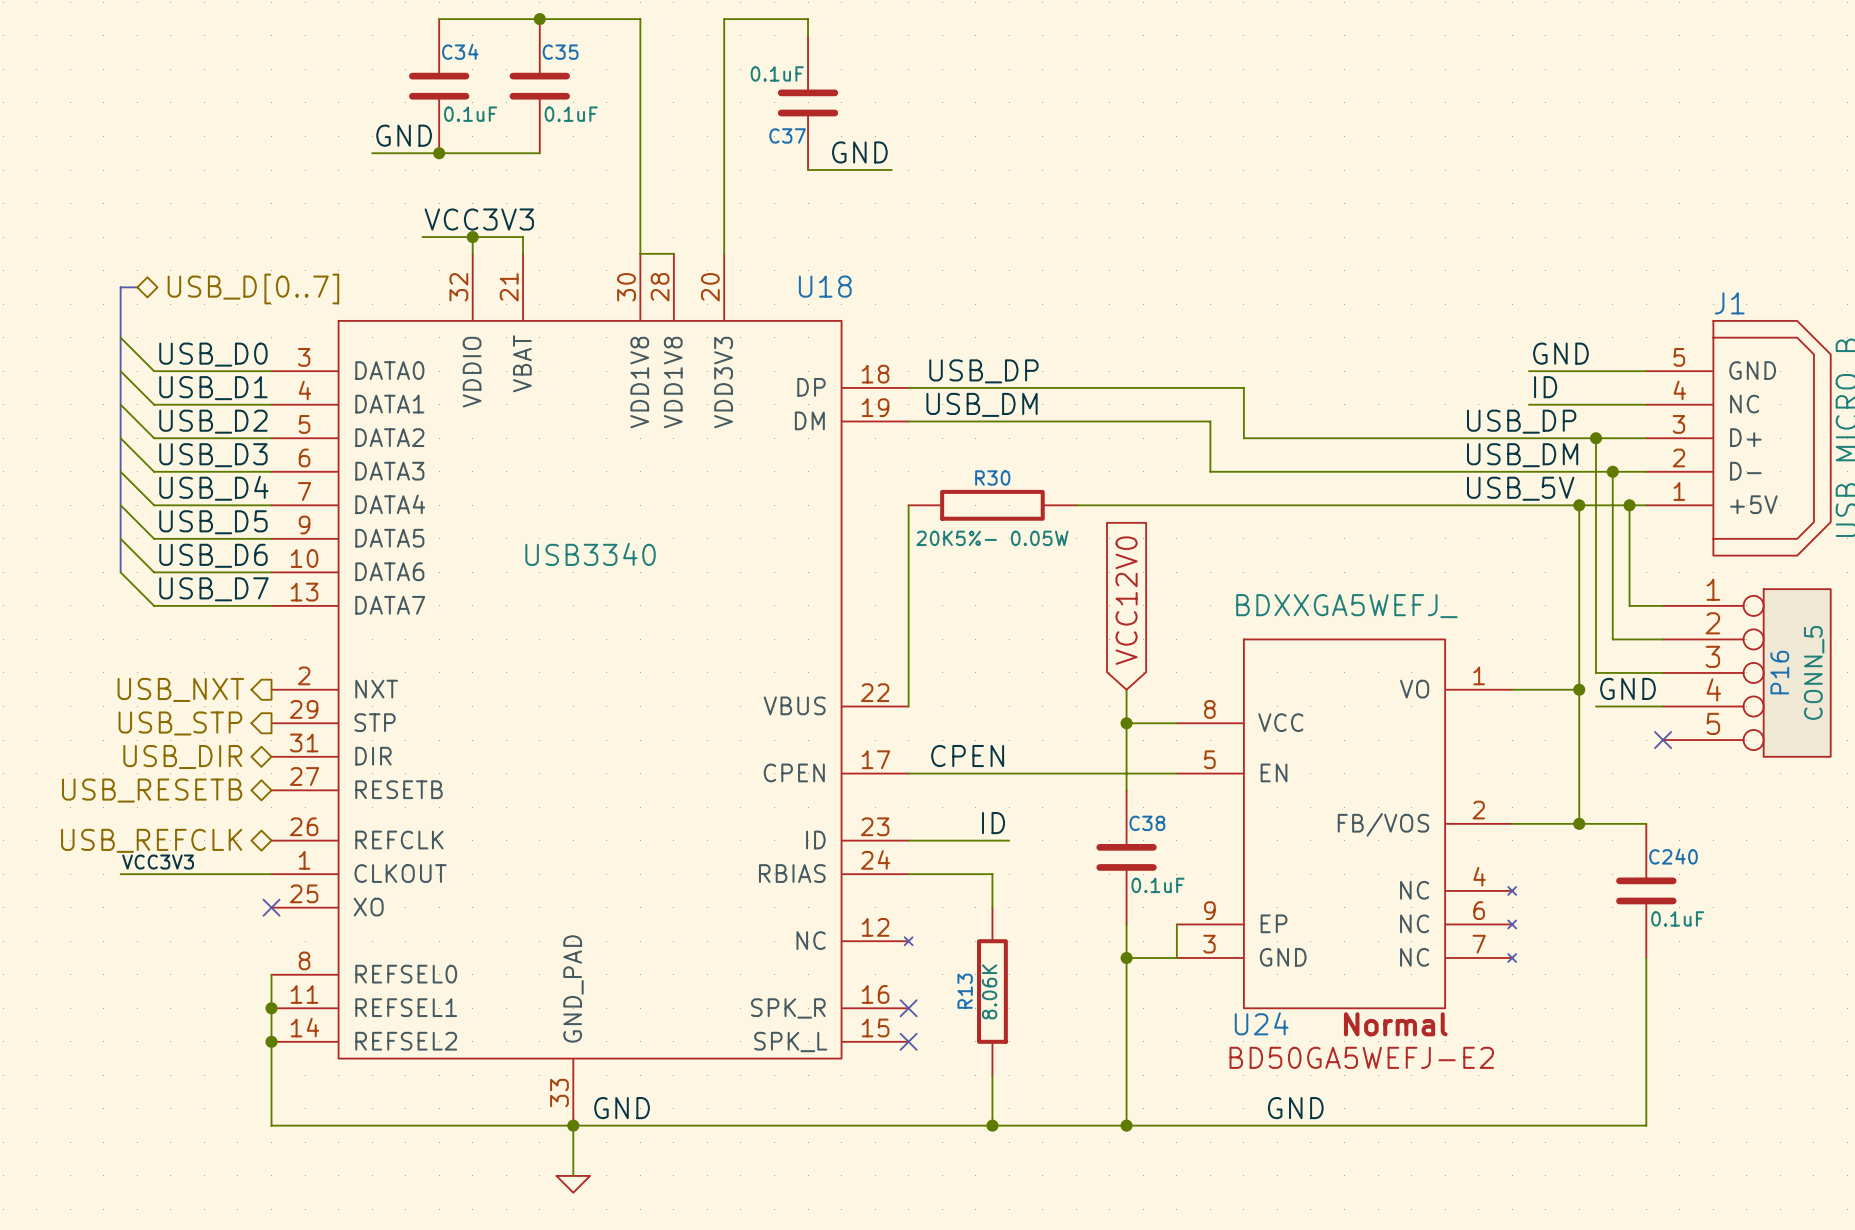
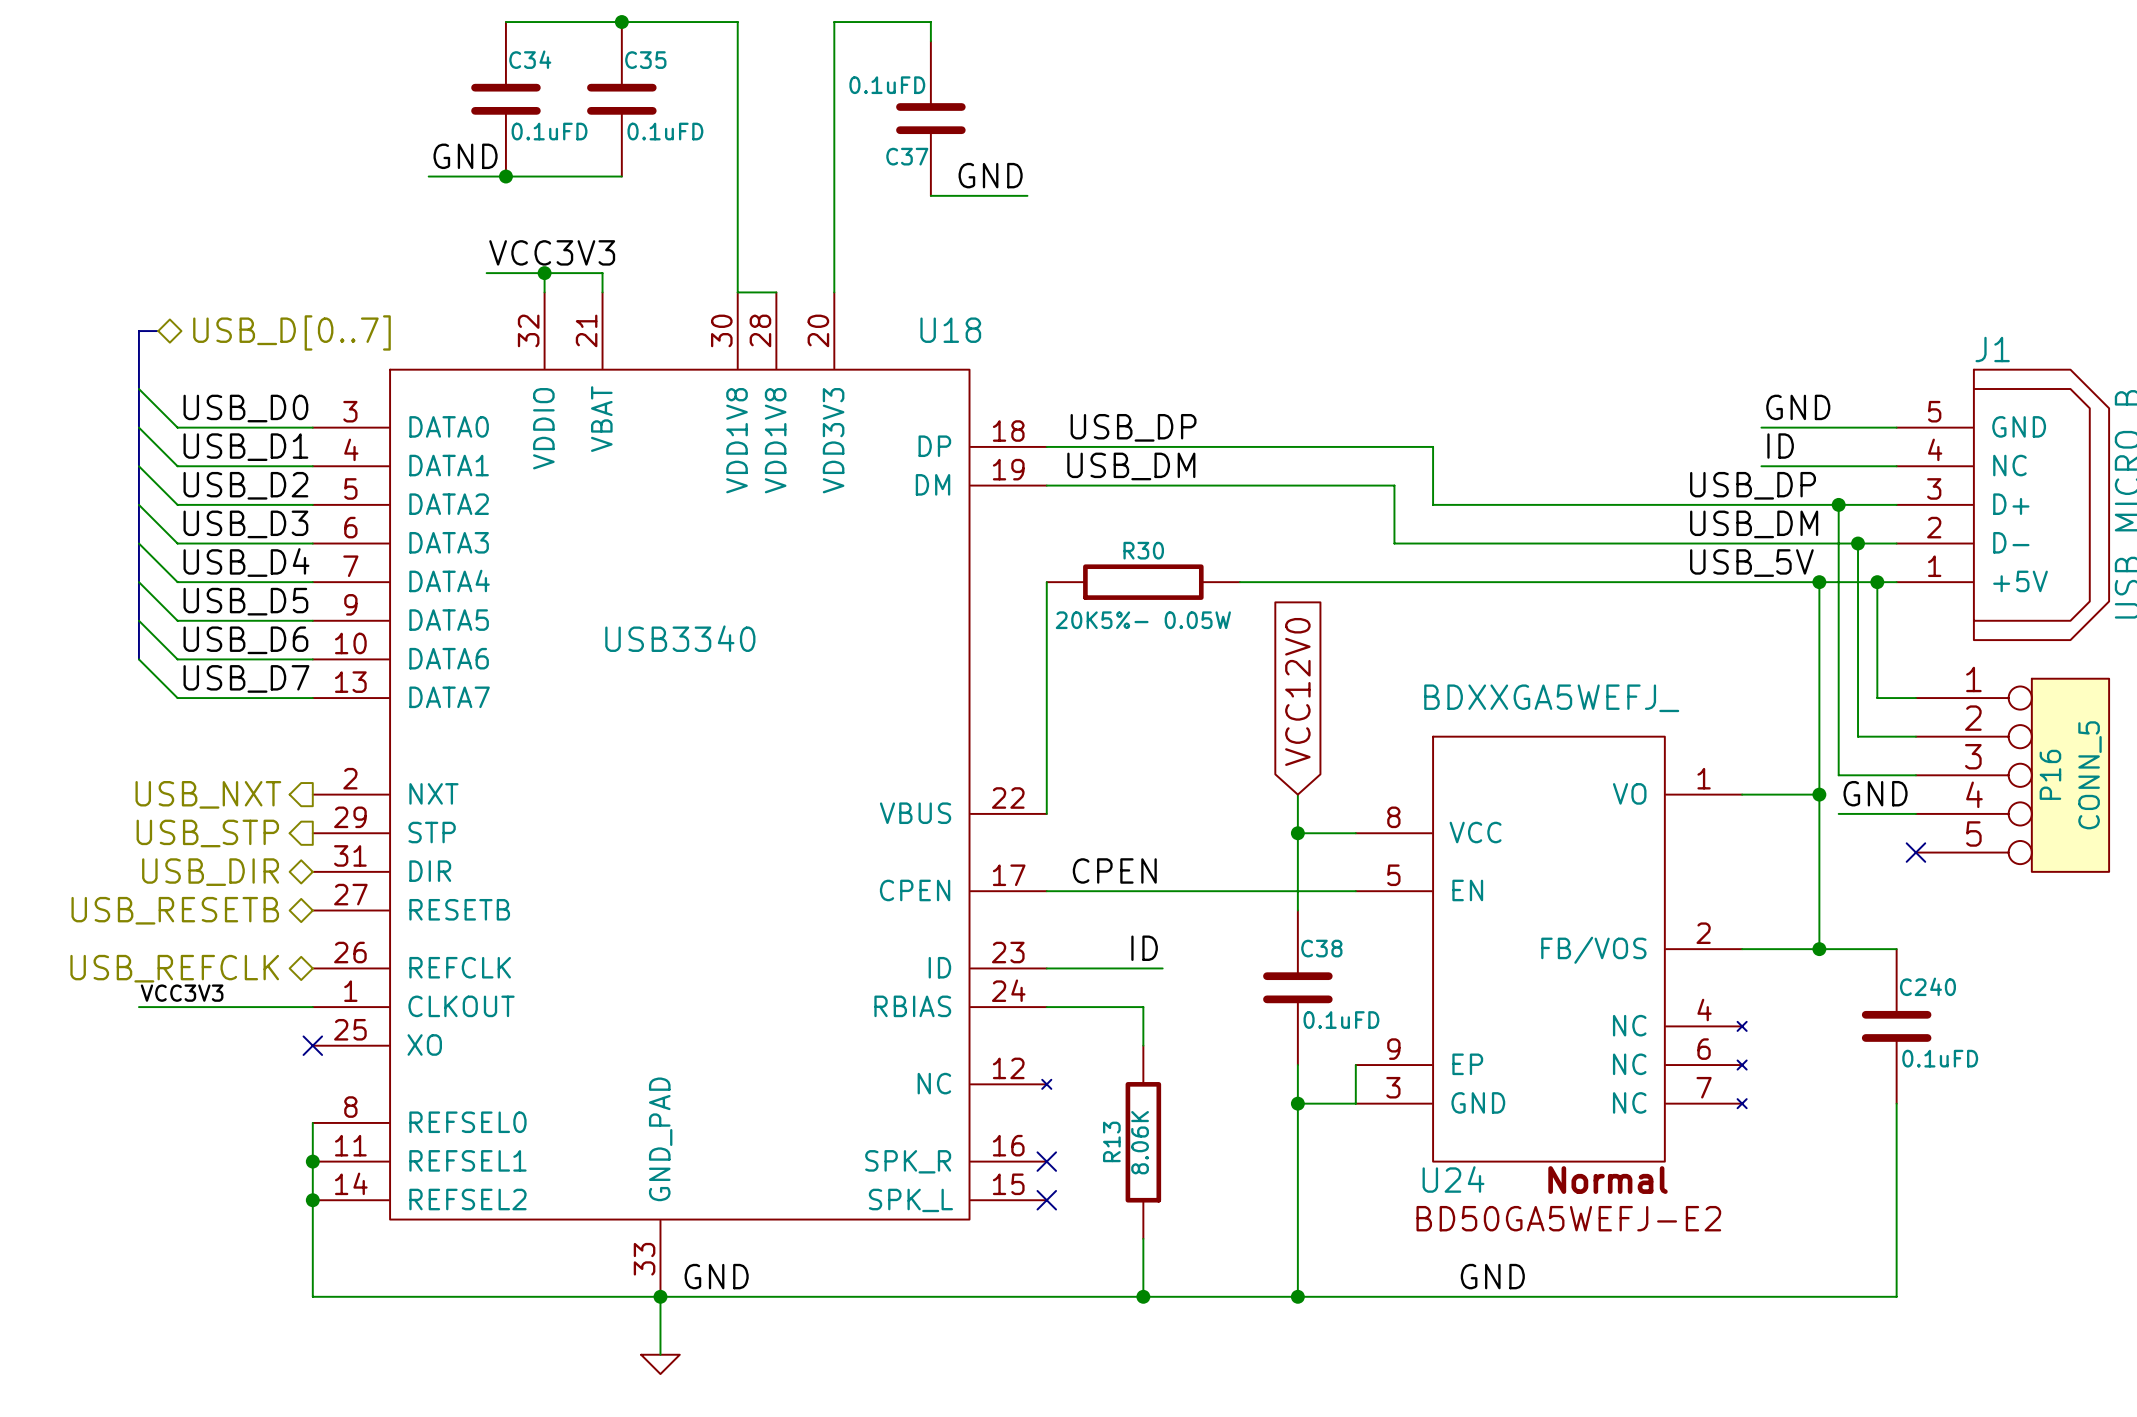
C37 value: 0.1uF (777, 73) -> 0.1uFD (887, 85)
C34 value: 0.1uF (470, 114) -> 0.1uFD (549, 131)
C35 value: 0.1uF (571, 114) -> 0.1uFD (665, 131)
C38 value: 0.1uF (1158, 885) -> 0.1uFD (1341, 1020)
C240 value: 0.1uF (1677, 918) -> 0.1uFD (1940, 1058)

